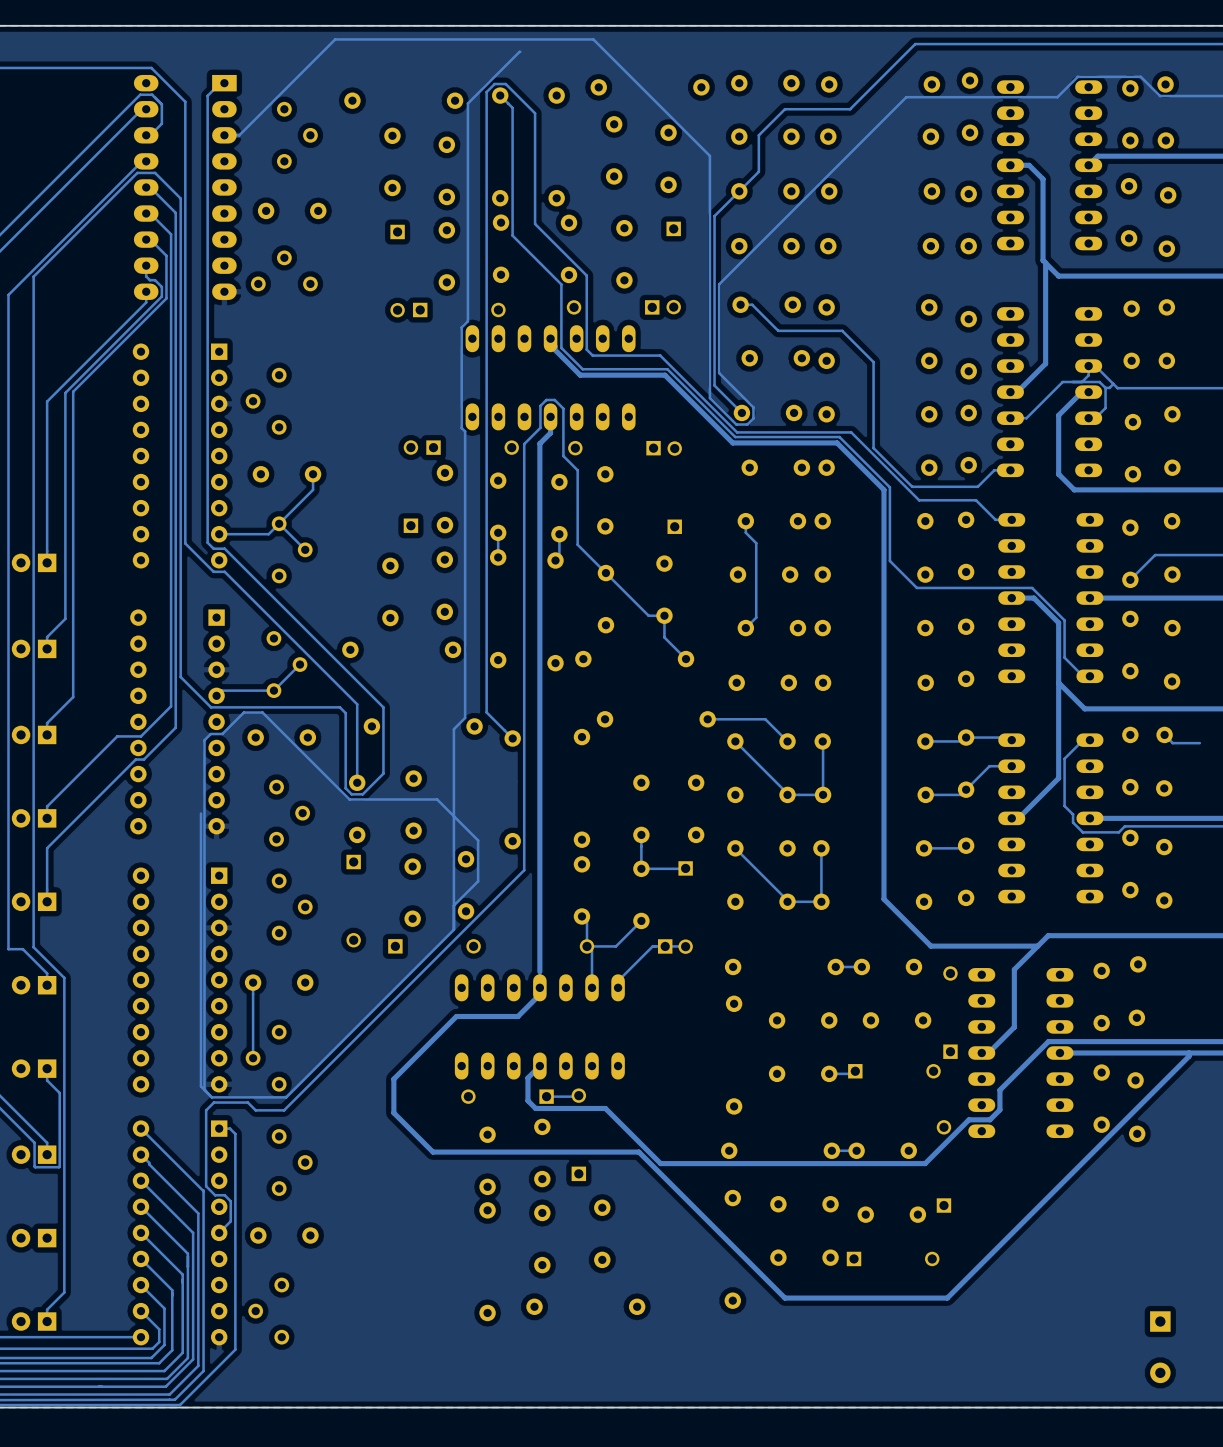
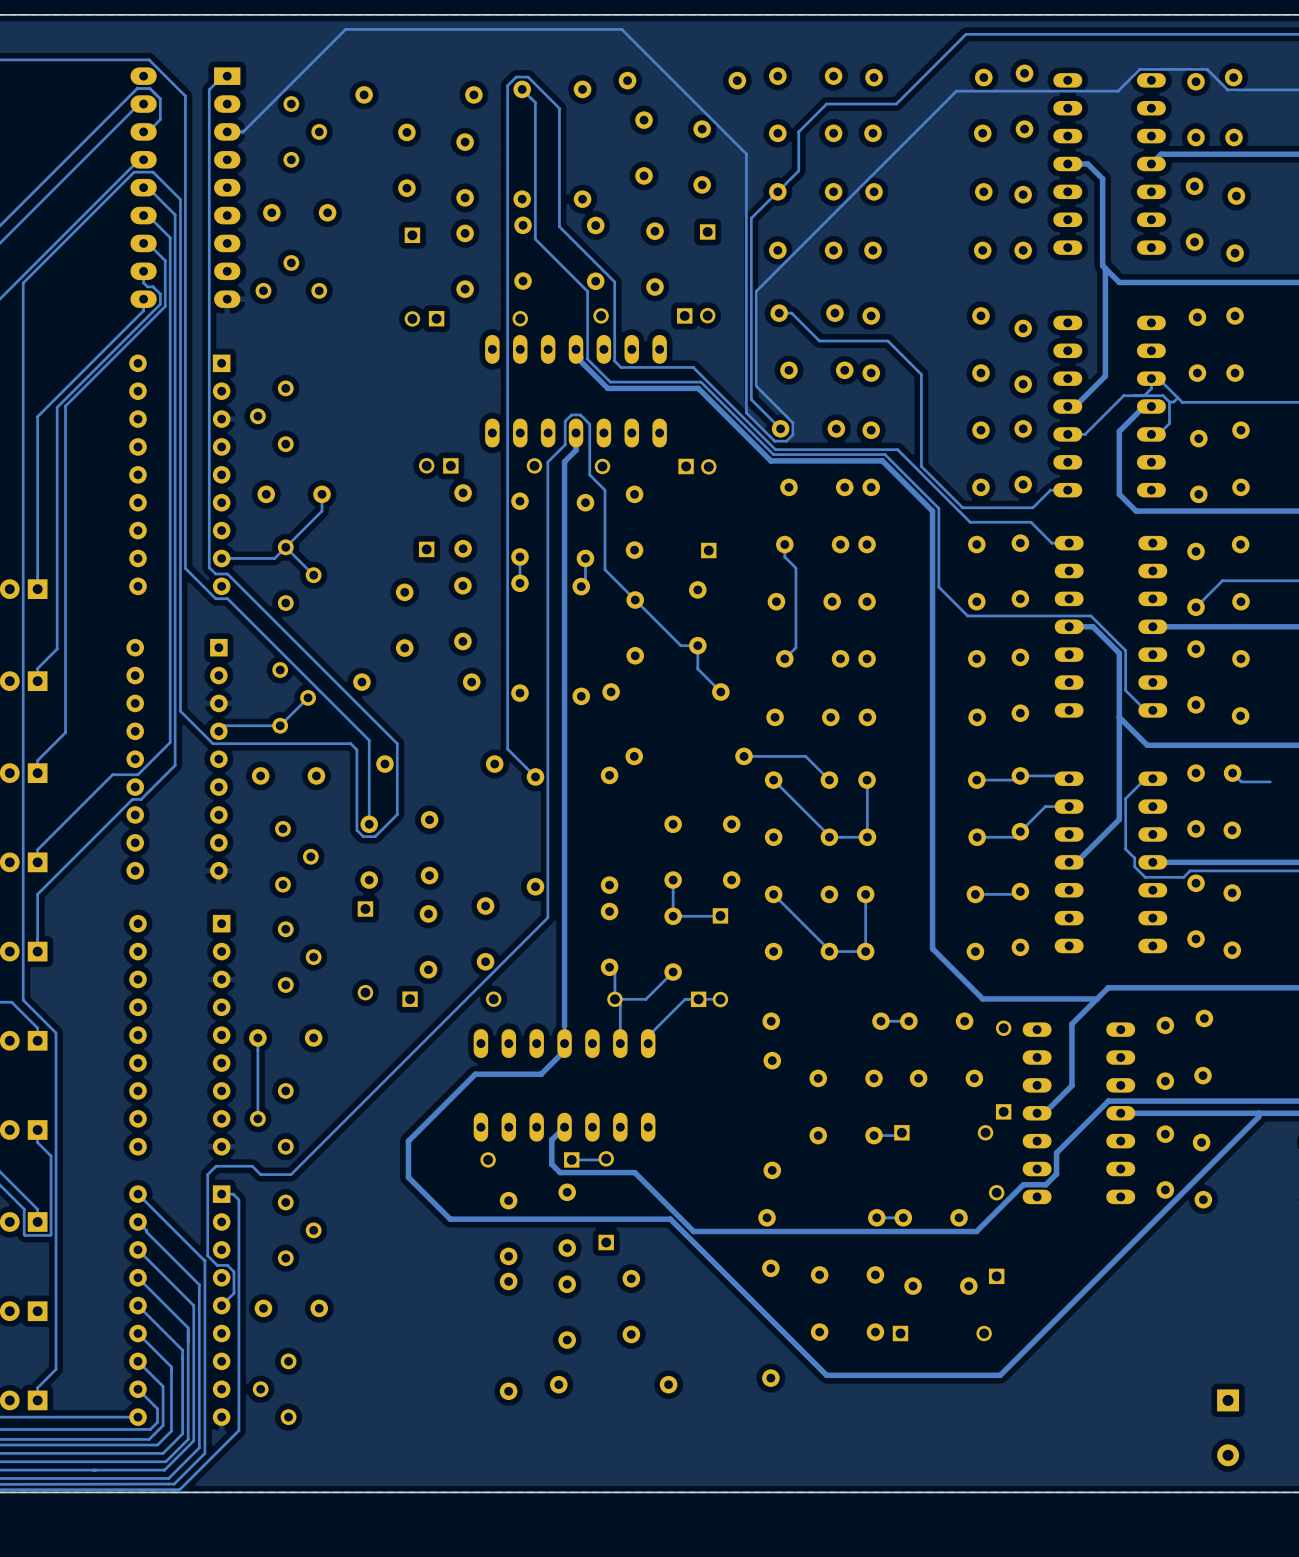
track: (520, 51) (467, 103) (467, 321) (461, 327) (461, 428) (465, 431) (465, 717) (453, 729) (453, 929) (286, 1097) (211, 1097) (200, 1086) (200, 813) -> none
track: (453, 905) (478, 881) (478, 840) (437, 799) (349, 799) (262, 712) (243, 712) (222, 734) (210, 734) (204, 740) (204, 1090) -> none

